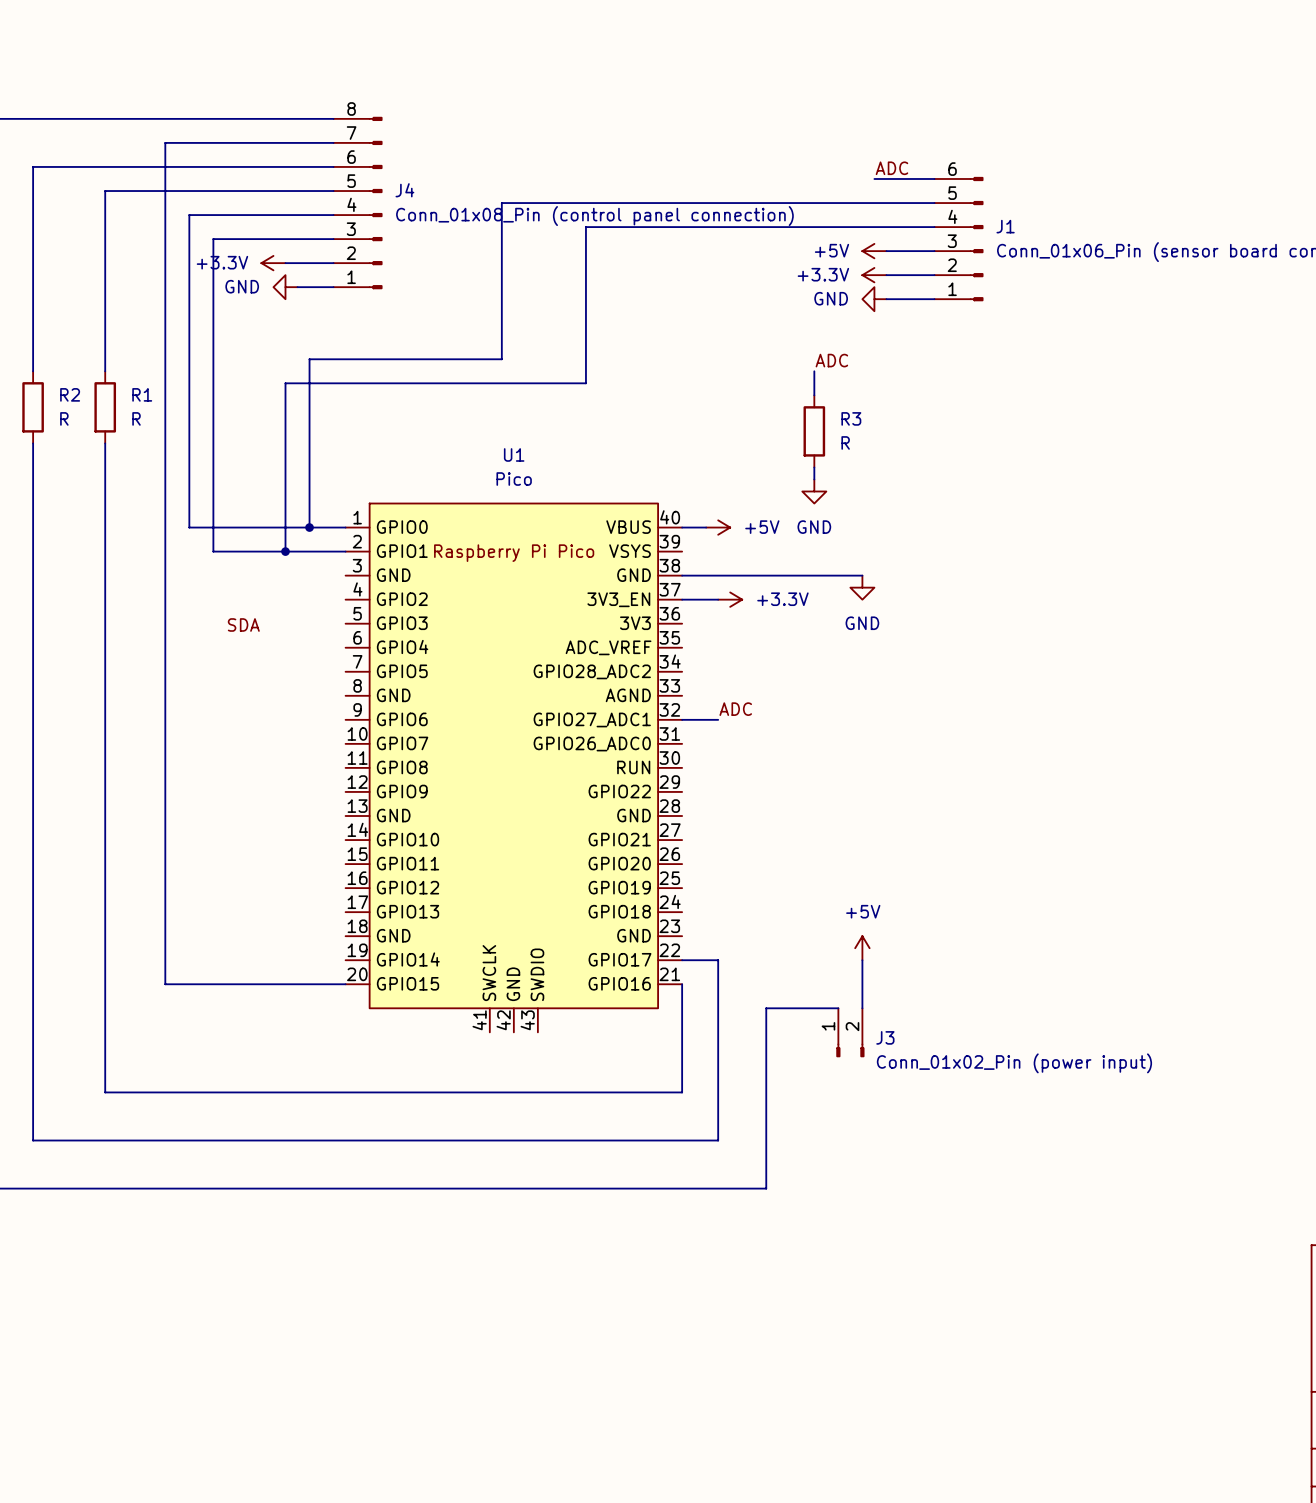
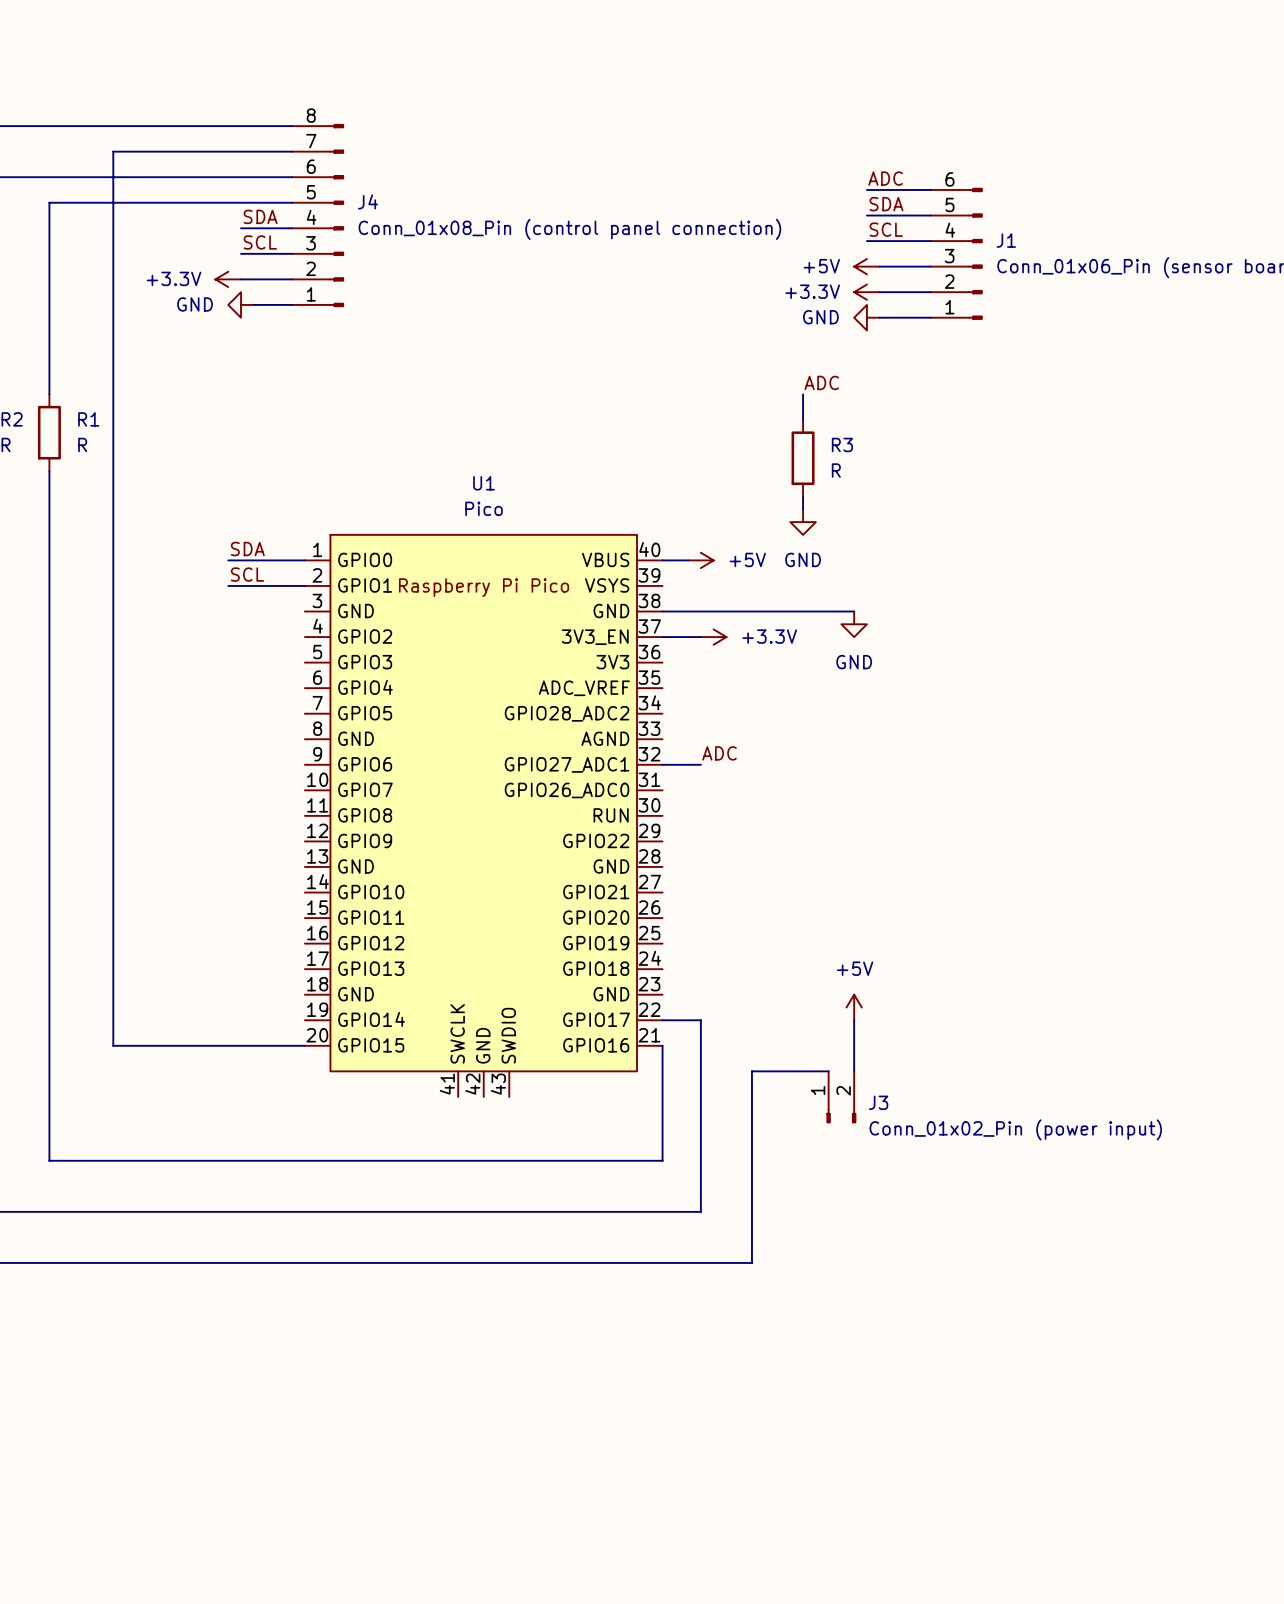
label: none -> SDA (886, 204)
wire: (874, 203) (501, 203) (501, 359) (309, 359) (309, 527) -> none
label: none -> SDA (260, 216)
wire: (285, 215) (189, 215) (189, 527) (273, 527) -> none
label: none -> SCL (886, 229)
wire: (874, 227) (585, 227) (585, 383) (285, 383) (285, 551) -> none
label: none -> SCL (260, 242)
wire: (285, 239) (213, 239) (213, 551) (273, 551) -> none
junction: (309, 527) -> none
label: none -> SCL (247, 574)
junction: (285, 551) -> none
label position: SDA (243, 624) -> SDA (247, 549)

